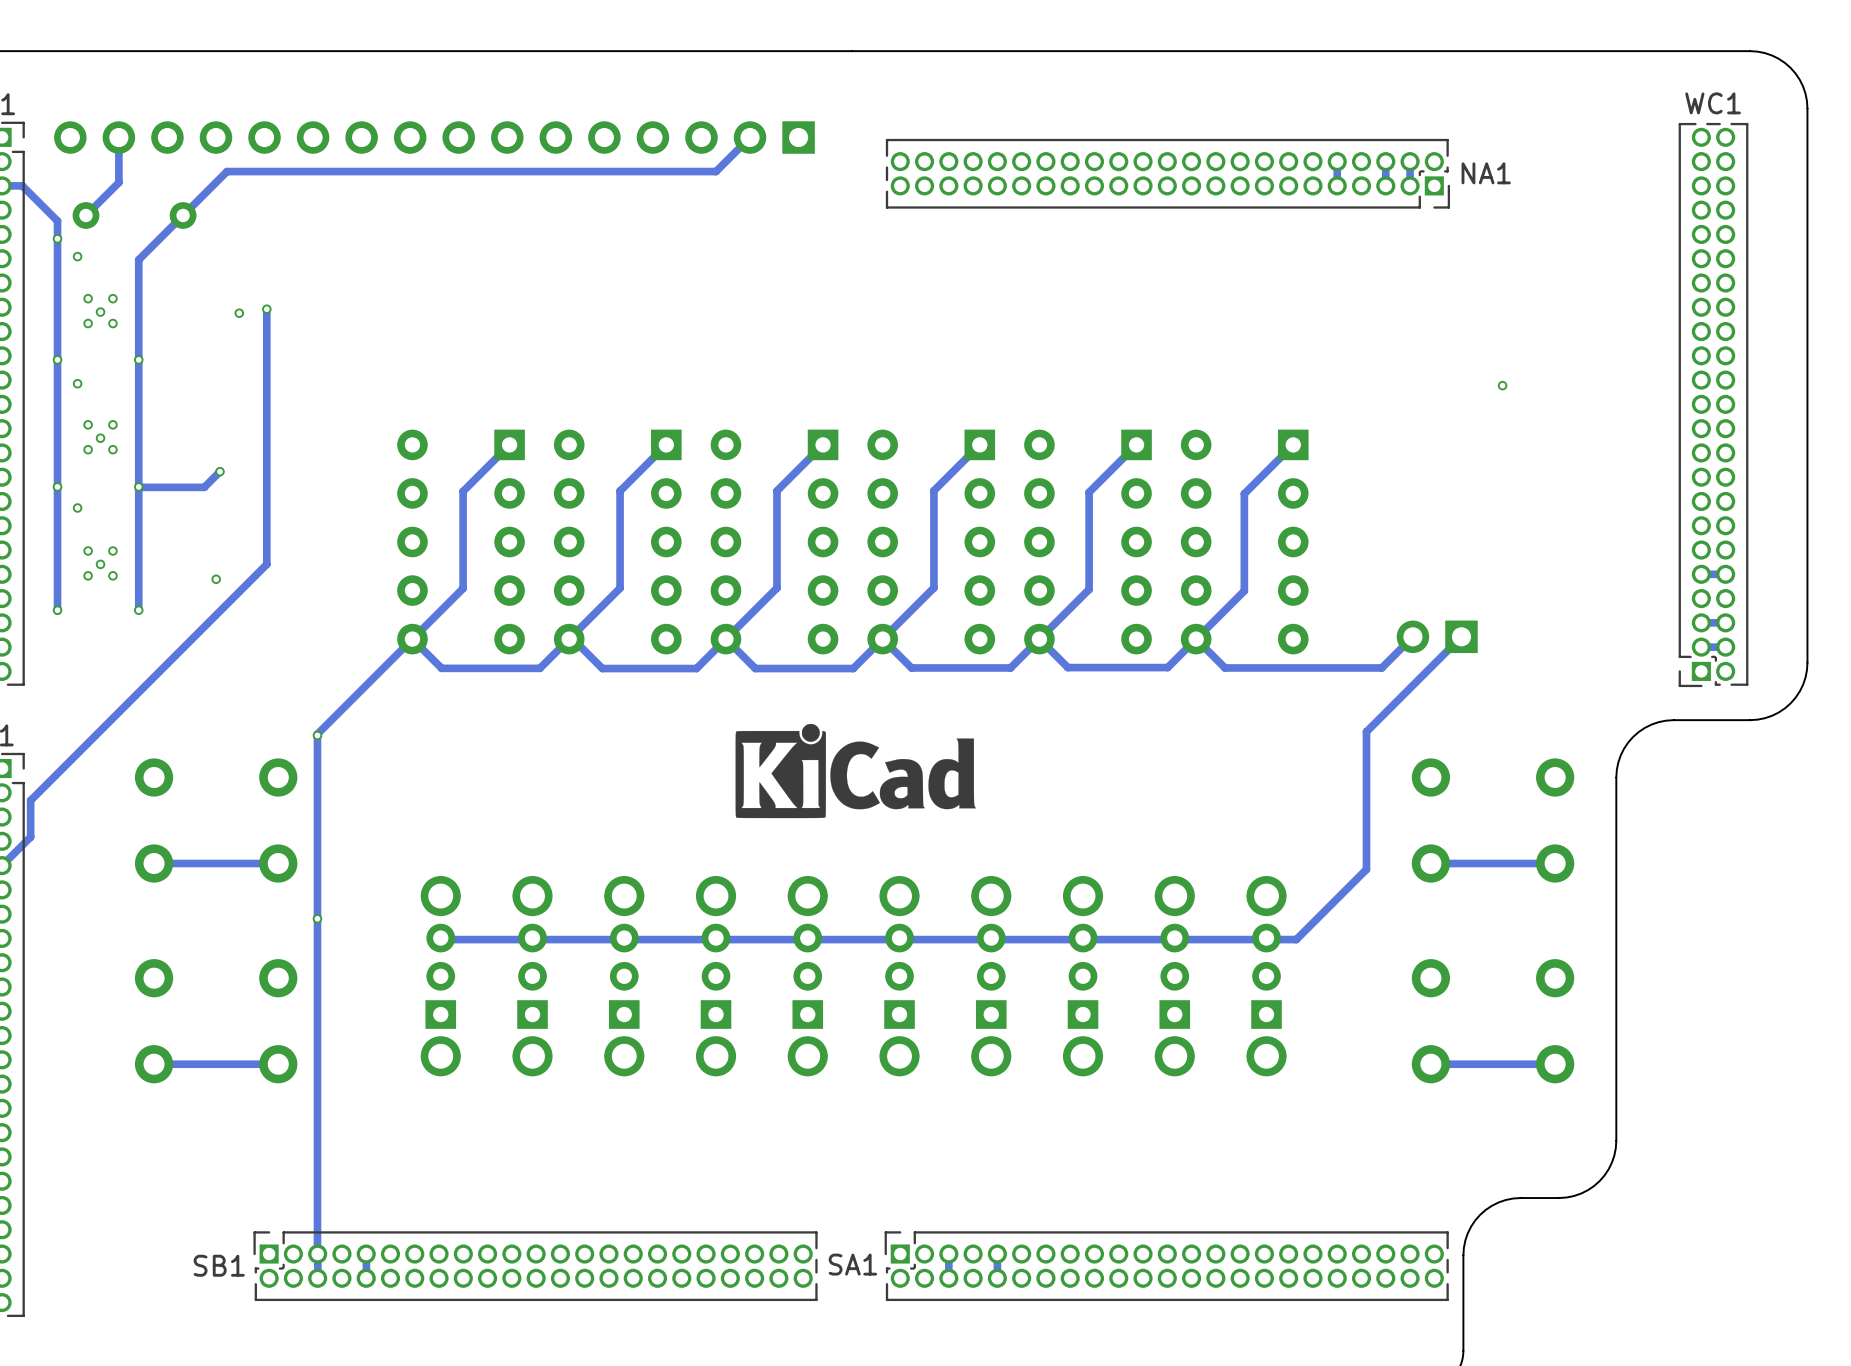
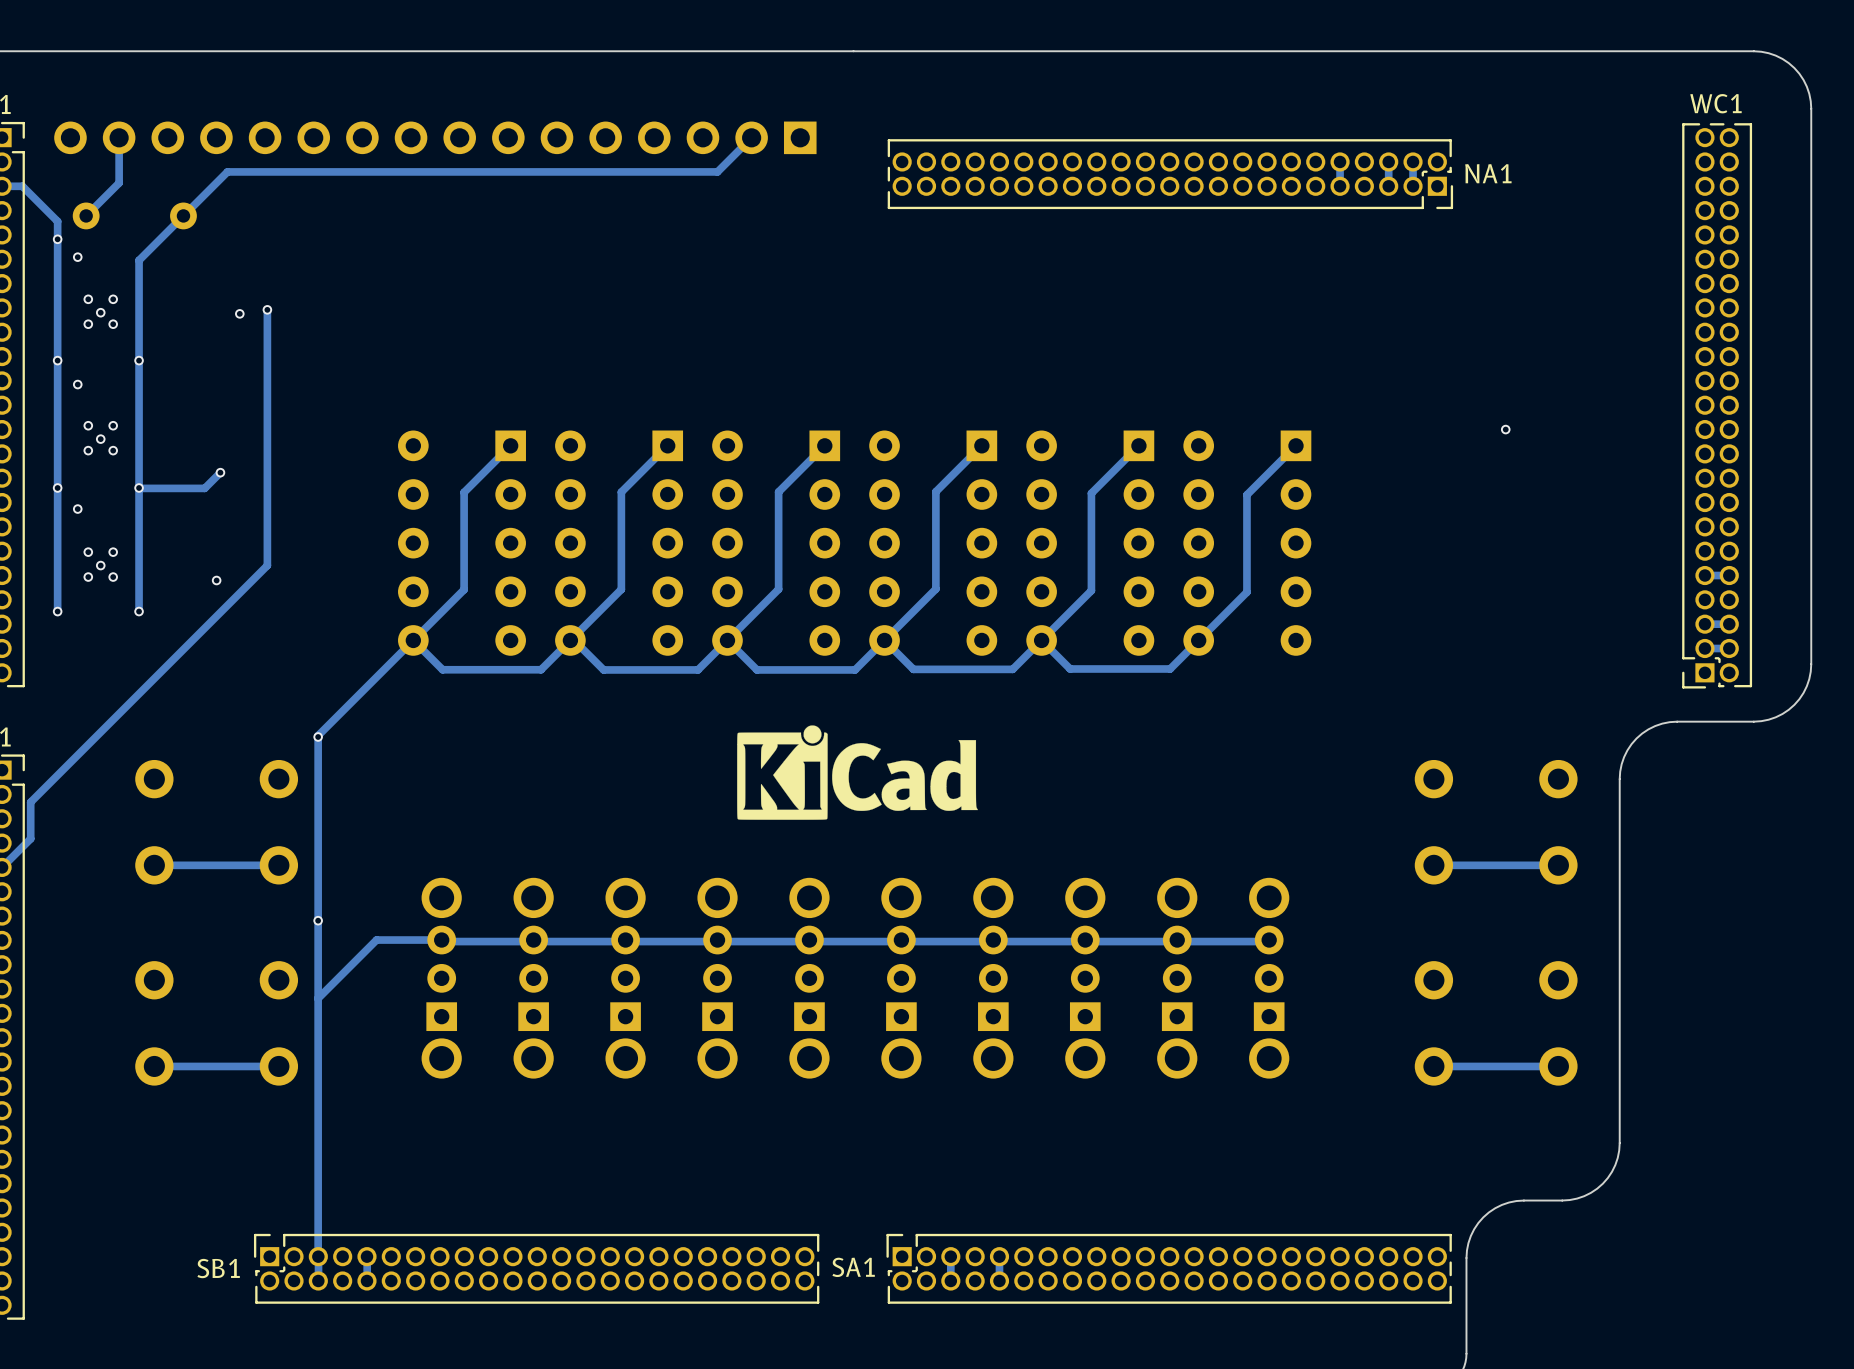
via position: (1502, 385) -> (1505, 429)
track: (1412, 636) (1381, 667) (1225, 667) (1196, 639) -> none
part: (1437, 636) -> none
track: (1461, 636) (1366, 731) (1366, 869) (1296, 939) (1268, 939) -> none
track: none -> (441, 940) (376, 940) (318, 998)

